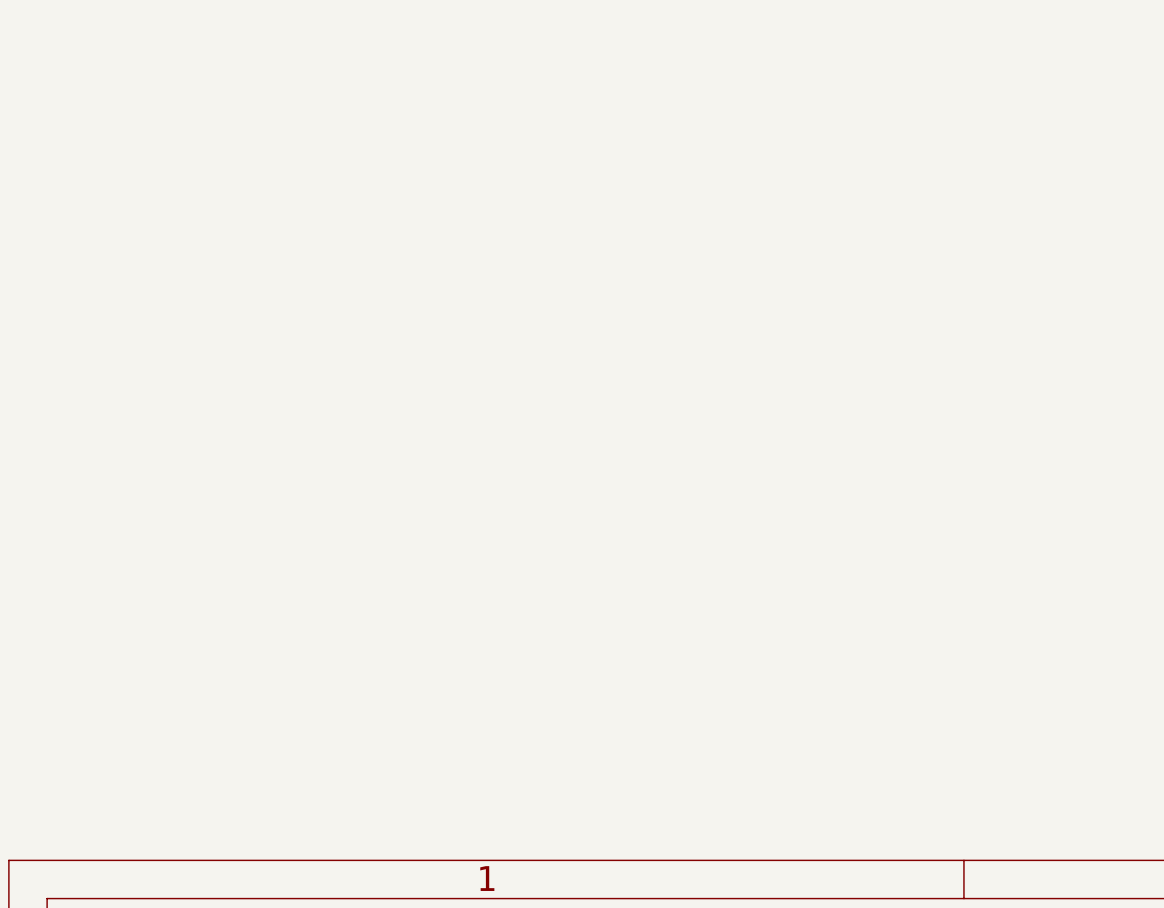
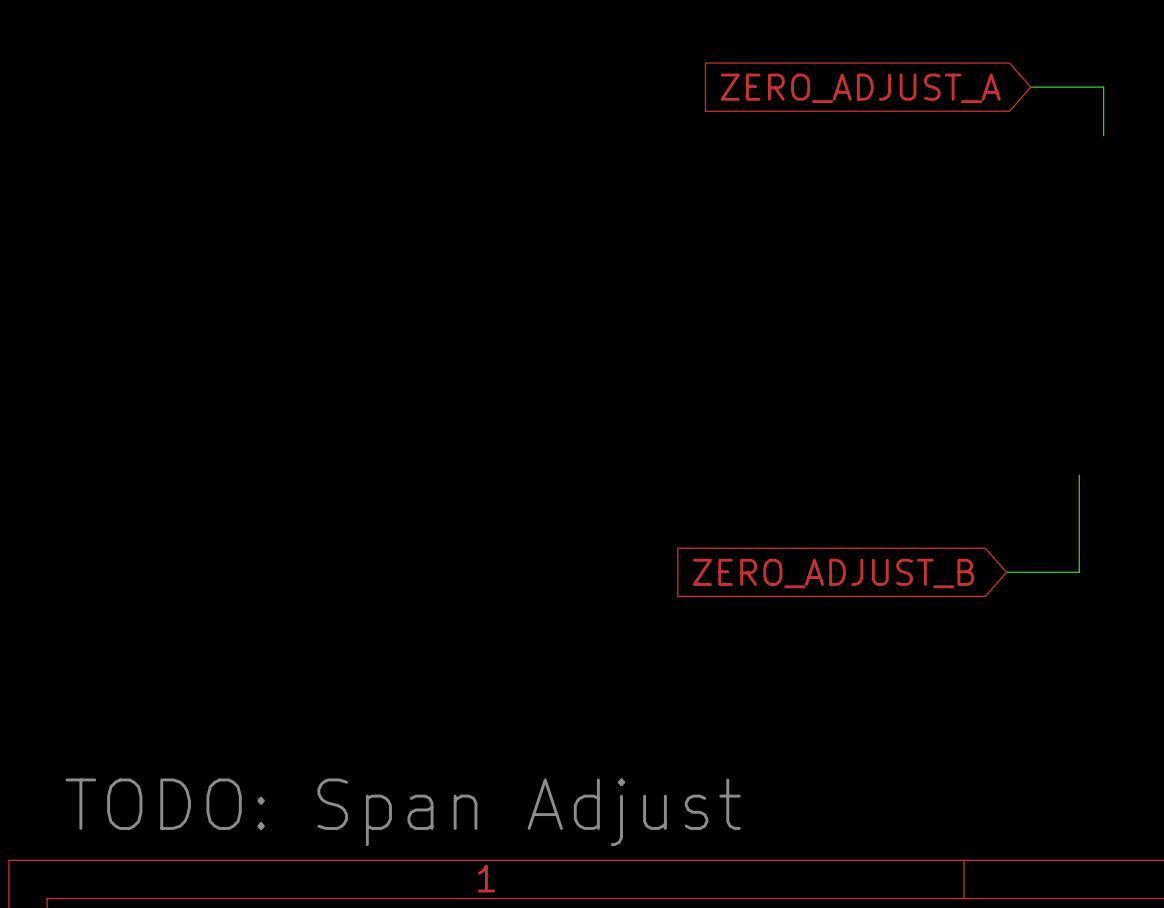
wire: none -> (1030, 87) (1103, 87) (1103, 135)
global label: none -> ZERO_ADJUST_A (860, 88)
wire: none -> (1079, 475) (1079, 572) (1006, 572)
global label: none -> ZERO_ADJUST_B (833, 573)
text: none -> TODO: Span Adjust (403, 812)

